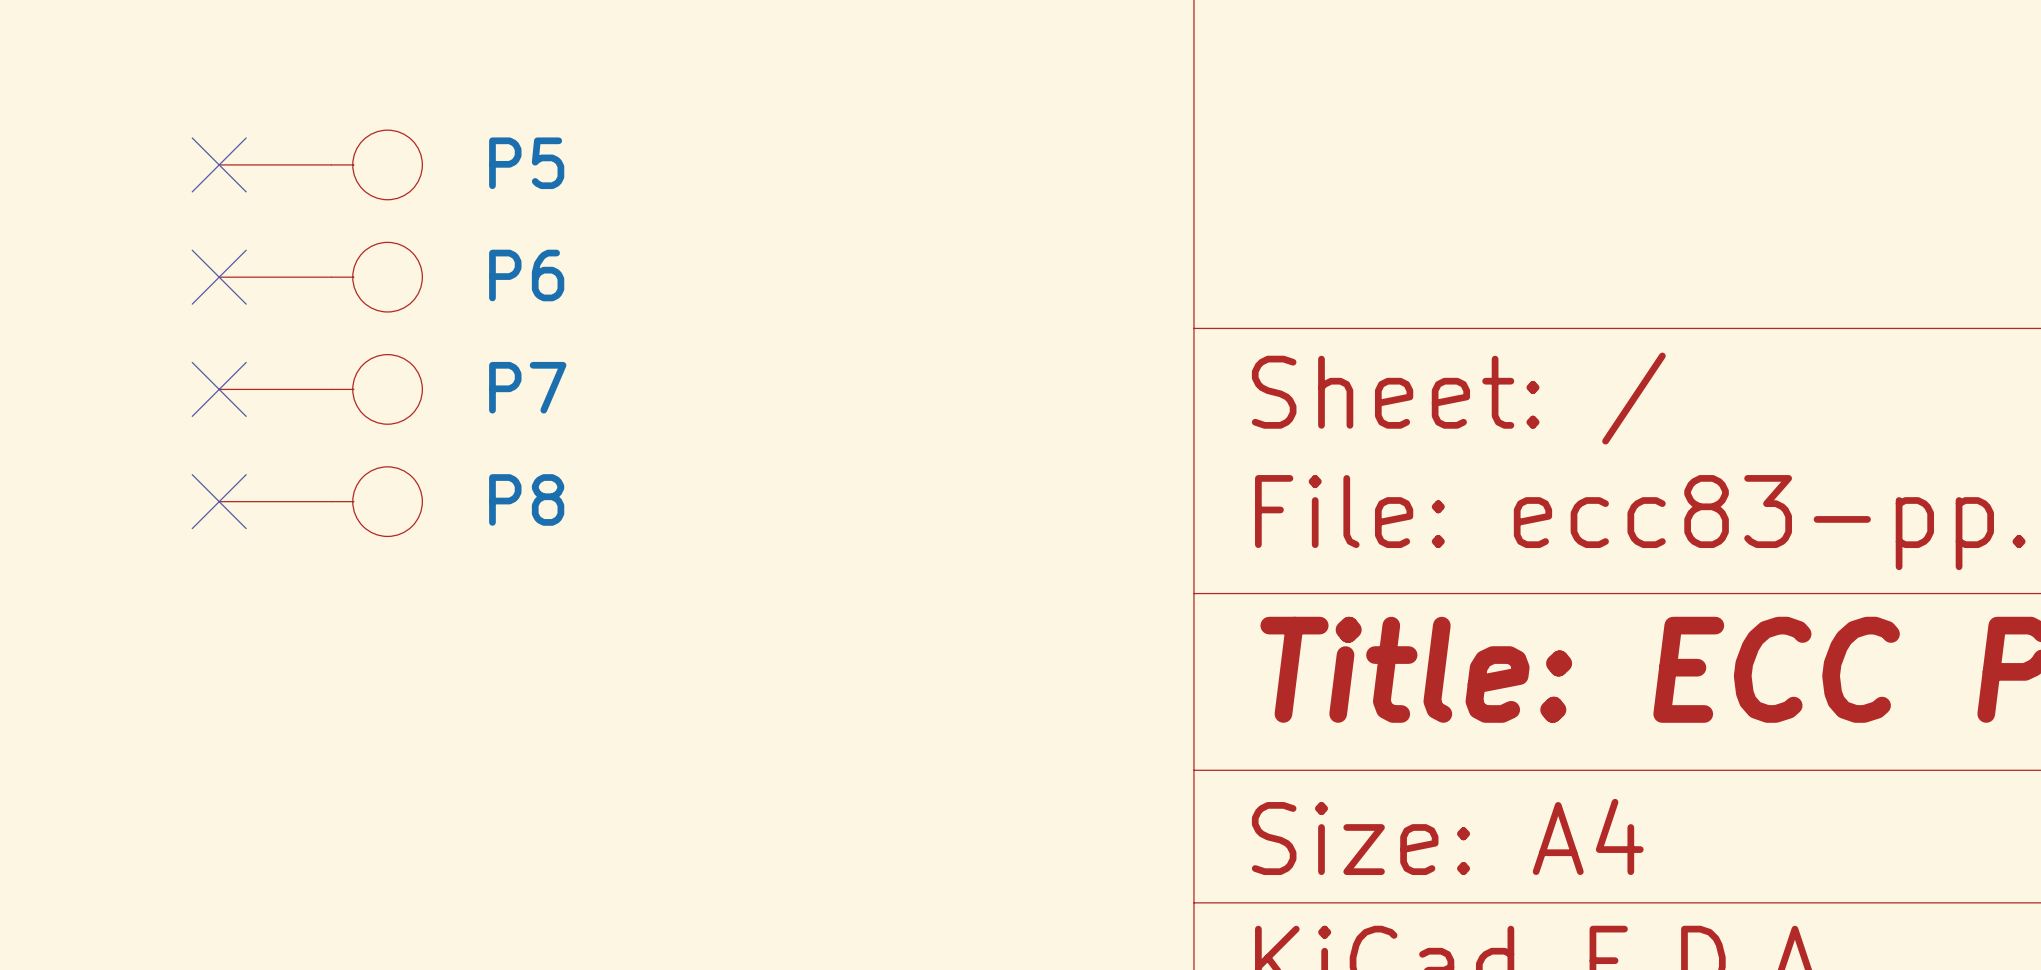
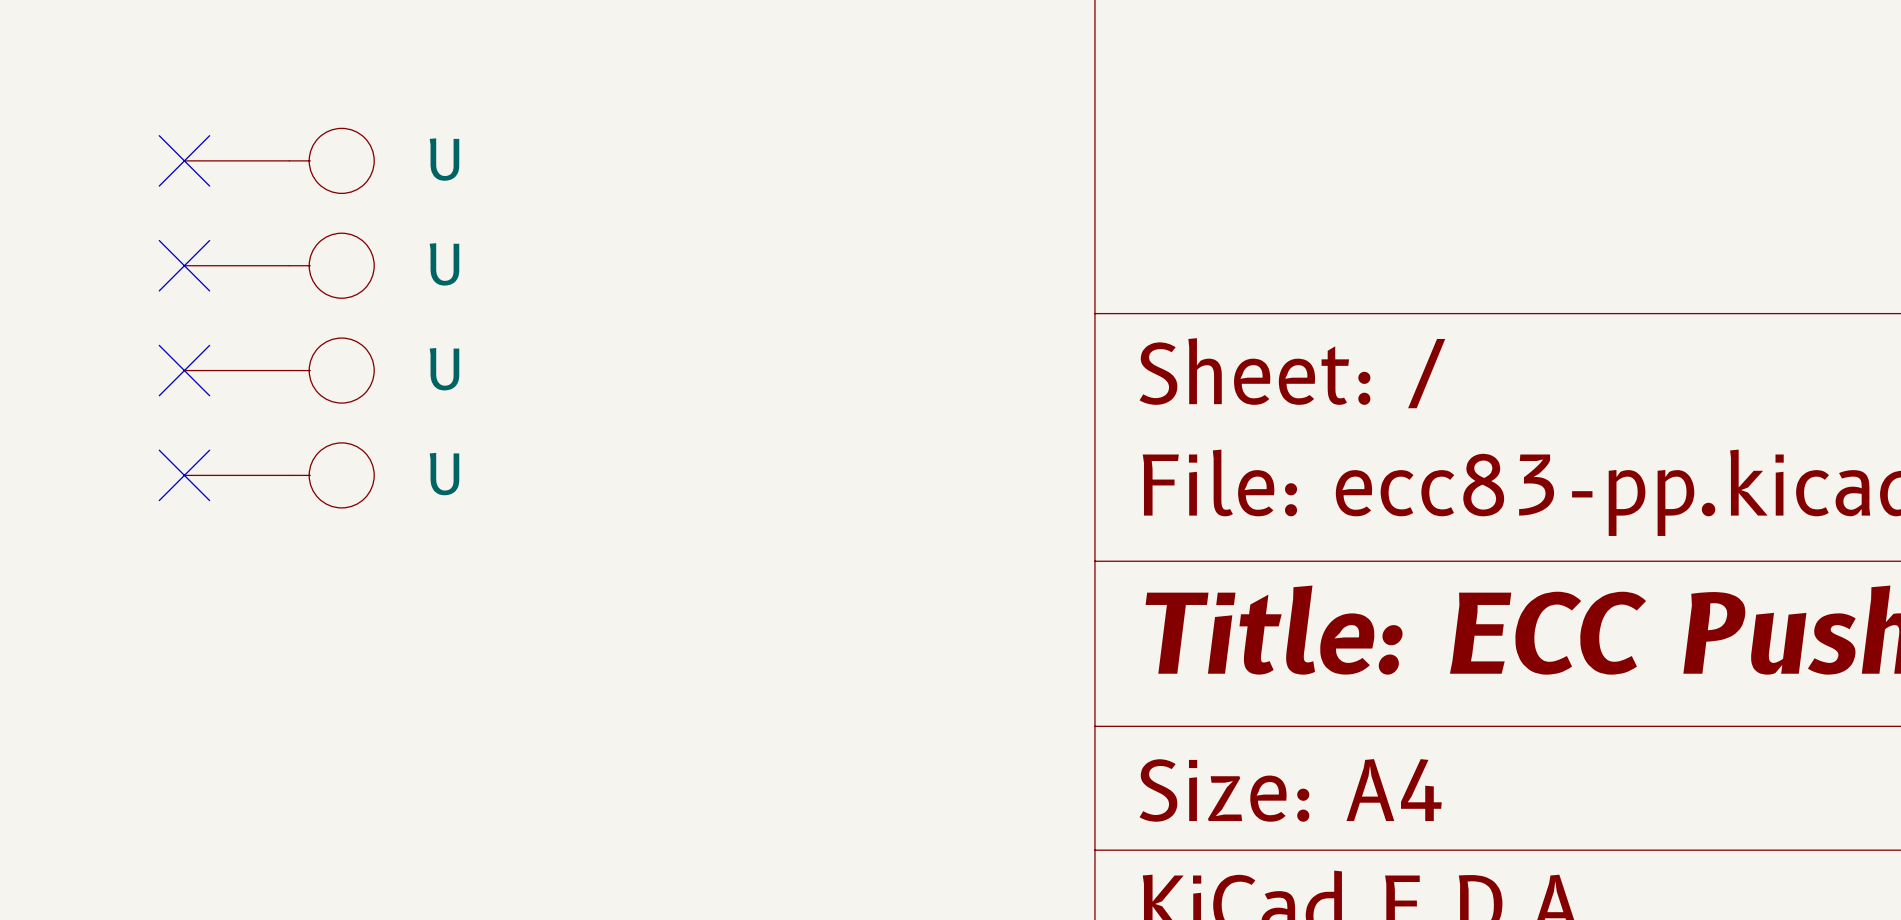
P5 name: P5 (526, 163) -> U (444, 159)
P6 name: P6 (526, 275) -> U (444, 264)
P7 name: P7 (527, 387) -> U (444, 369)
P8 name: P8 (526, 499) -> U (444, 474)

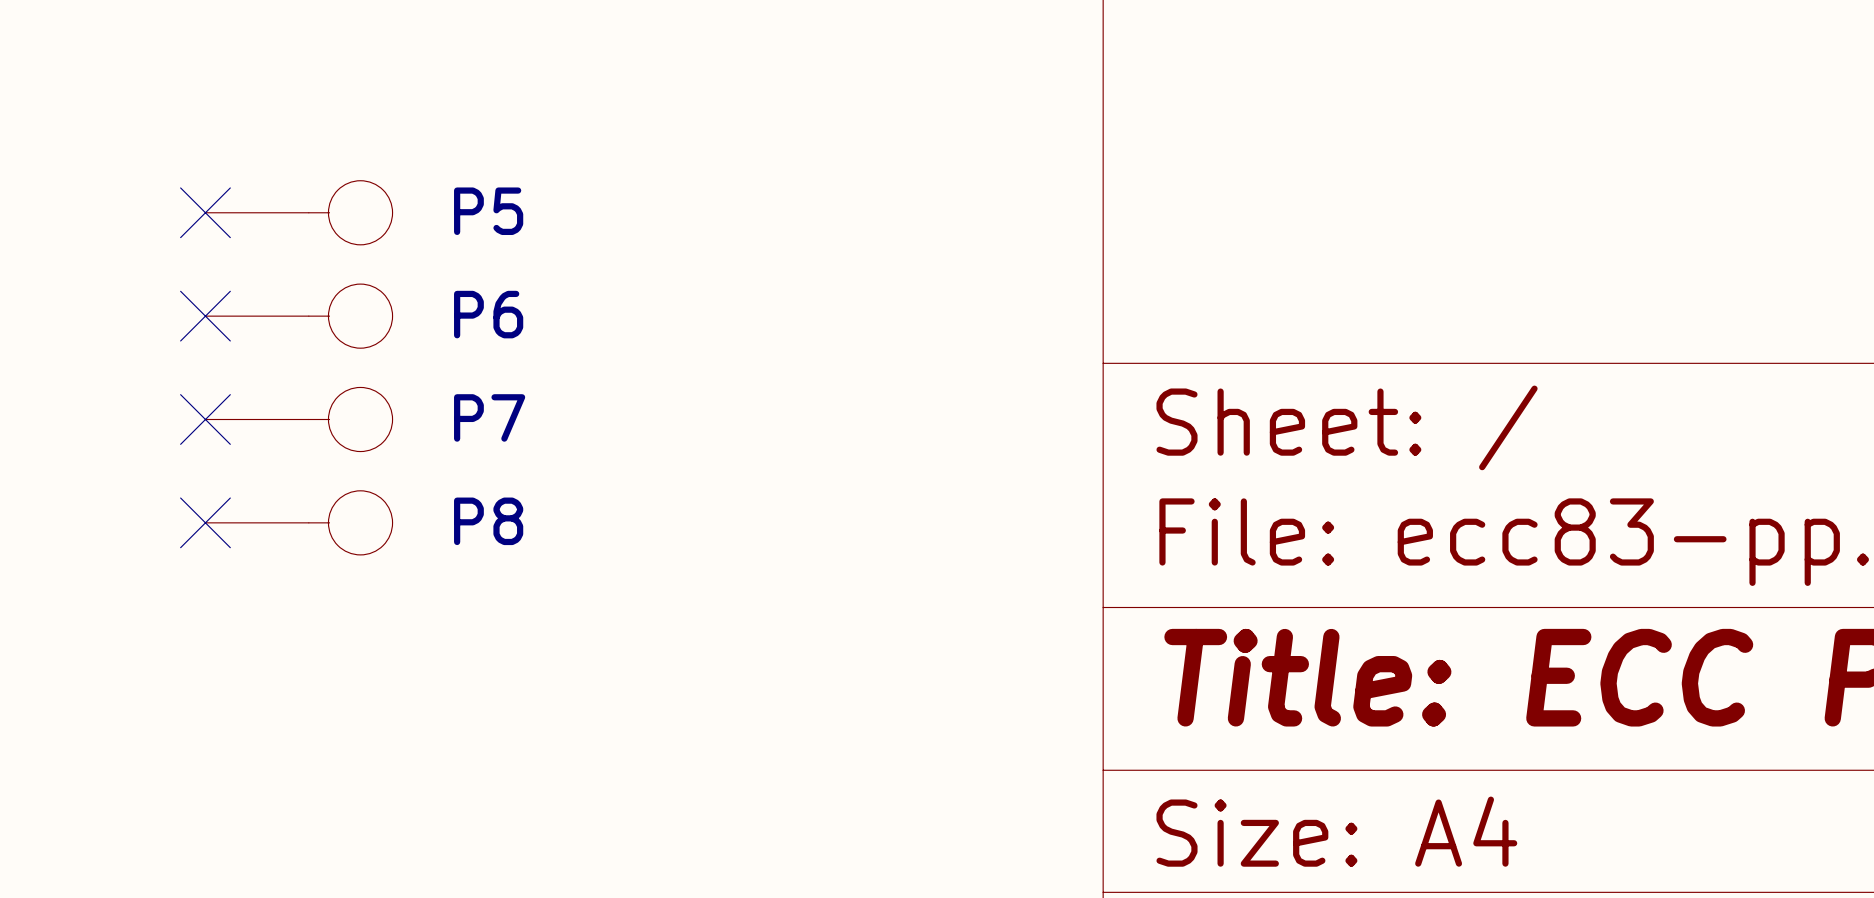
U name: U (444, 159) -> P5 (488, 211)
U name: U (444, 264) -> P6 (488, 314)
U name: U (444, 369) -> P7 (489, 417)
U name: U (444, 474) -> P8 (488, 521)

